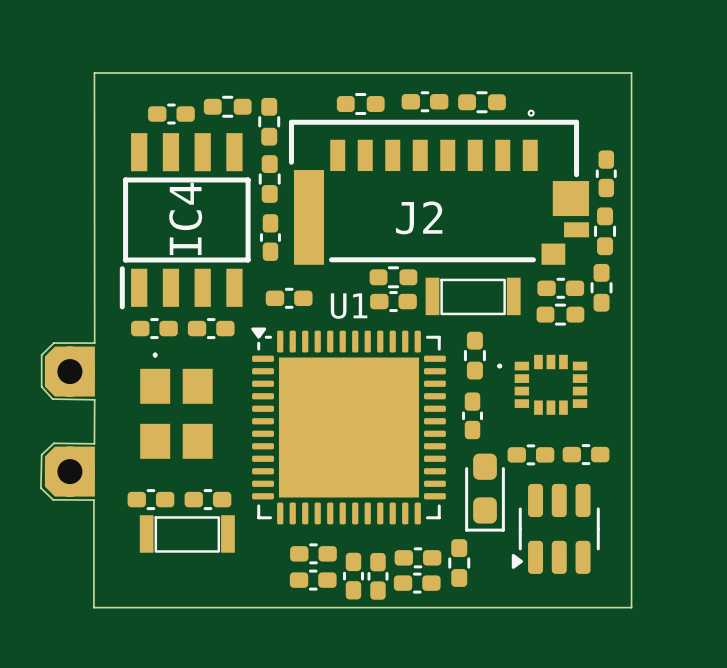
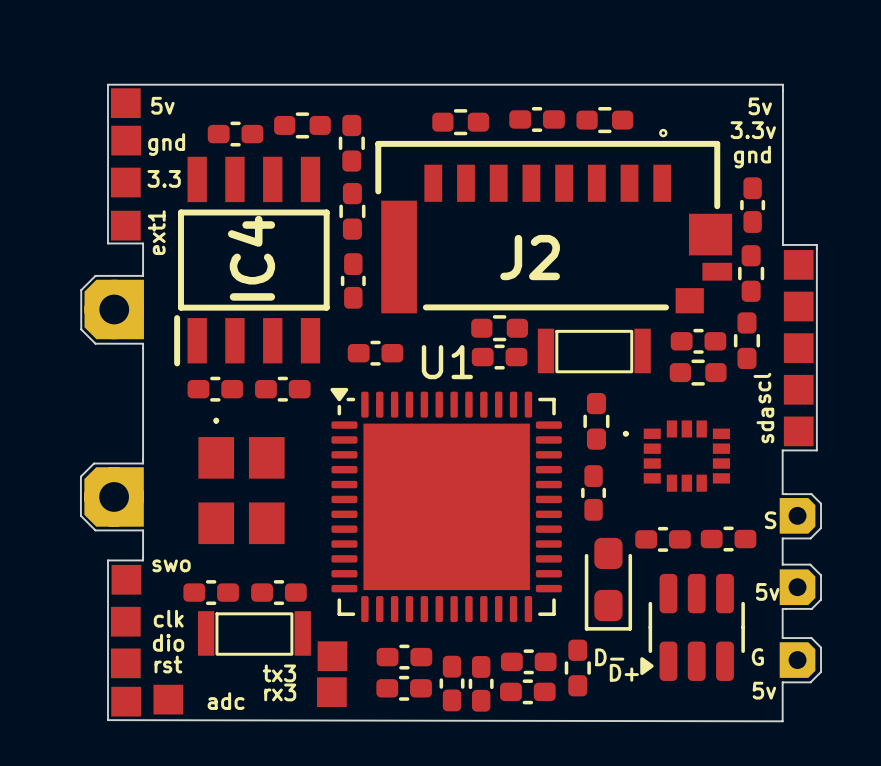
part: none -> (125, 103)
text: none -> 5v (162, 105)
text: none -> 5v (760, 106)
text: none -> 3.3v (753, 130)
part: none -> (126, 140)
text: none -> gnd (166, 144)
text: none -> gnd (752, 157)
text: none -> 3.3 (164, 178)
part: none -> (125, 182)
part: none -> (125, 225)
text: none -> ext1 (156, 232)
part: none -> (798, 264)
part: none -> (798, 306)
part: none -> (114, 309)
part: none -> (798, 348)
text: none -> scl (762, 388)
part: none -> (798, 389)
text: none -> sda (765, 425)
part: none -> (798, 431)
part position: (69, 371) -> (114, 496)
board edge: (631, 380) (631, 73) (94, 73) (94, 343) (53, 343) (41, 355) (41, 386) (52, 399) (94, 399) (94, 443) (53, 443) (41, 454) (40, 488) (53, 499) (93, 500) (93, 607) (631, 607) -> (782, 450) (816, 450) (816, 244) (782, 244) (782, 84) (107, 84) (107, 243) (143, 243) (143, 275) (95, 275) (81, 290) (81, 329) (95, 343) (143, 343) (143, 463) (94, 463) (80, 476) (80, 515) (95, 530) (143, 530) (143, 560) (107, 560) (107, 720) (782, 721)
board edge: (631, 416) (631, 454) -> (782, 494) (811, 494) (821, 503) (821, 528) (810, 538) (782, 538)
part: none -> (797, 515)
text: none -> S (770, 520)
part footprint: [44, 446, 95, 497] -> [111, 564, 142, 595]
text: none -> swo (171, 565)
board edge: (631, 476) (631, 513) -> (782, 564) (810, 564) (821, 575) (821, 599) (811, 608) (782, 608)
part: none -> (797, 587)
text: none -> 5v (767, 591)
text: none -> clk (168, 618)
part: none -> (125, 621)
board edge: (631, 537) (631, 575) -> (782, 638) (811, 638) (821, 647) (821, 671) (810, 682) (782, 682)
text: none -> dio (168, 642)
part: none -> (332, 656)
text: none -> G (757, 657)
text: none -> D- (609, 657)
part: none -> (797, 660)
part: none -> (125, 663)
text: none -> rst (168, 664)
text: none -> tx3 (279, 673)
text: none -> D+ (624, 672)
text: none -> 5v (764, 690)
text: none -> rx3 (280, 692)
part: none -> (331, 692)
part: none -> (168, 699)
text: none -> adc (226, 701)
part: none -> (126, 701)

